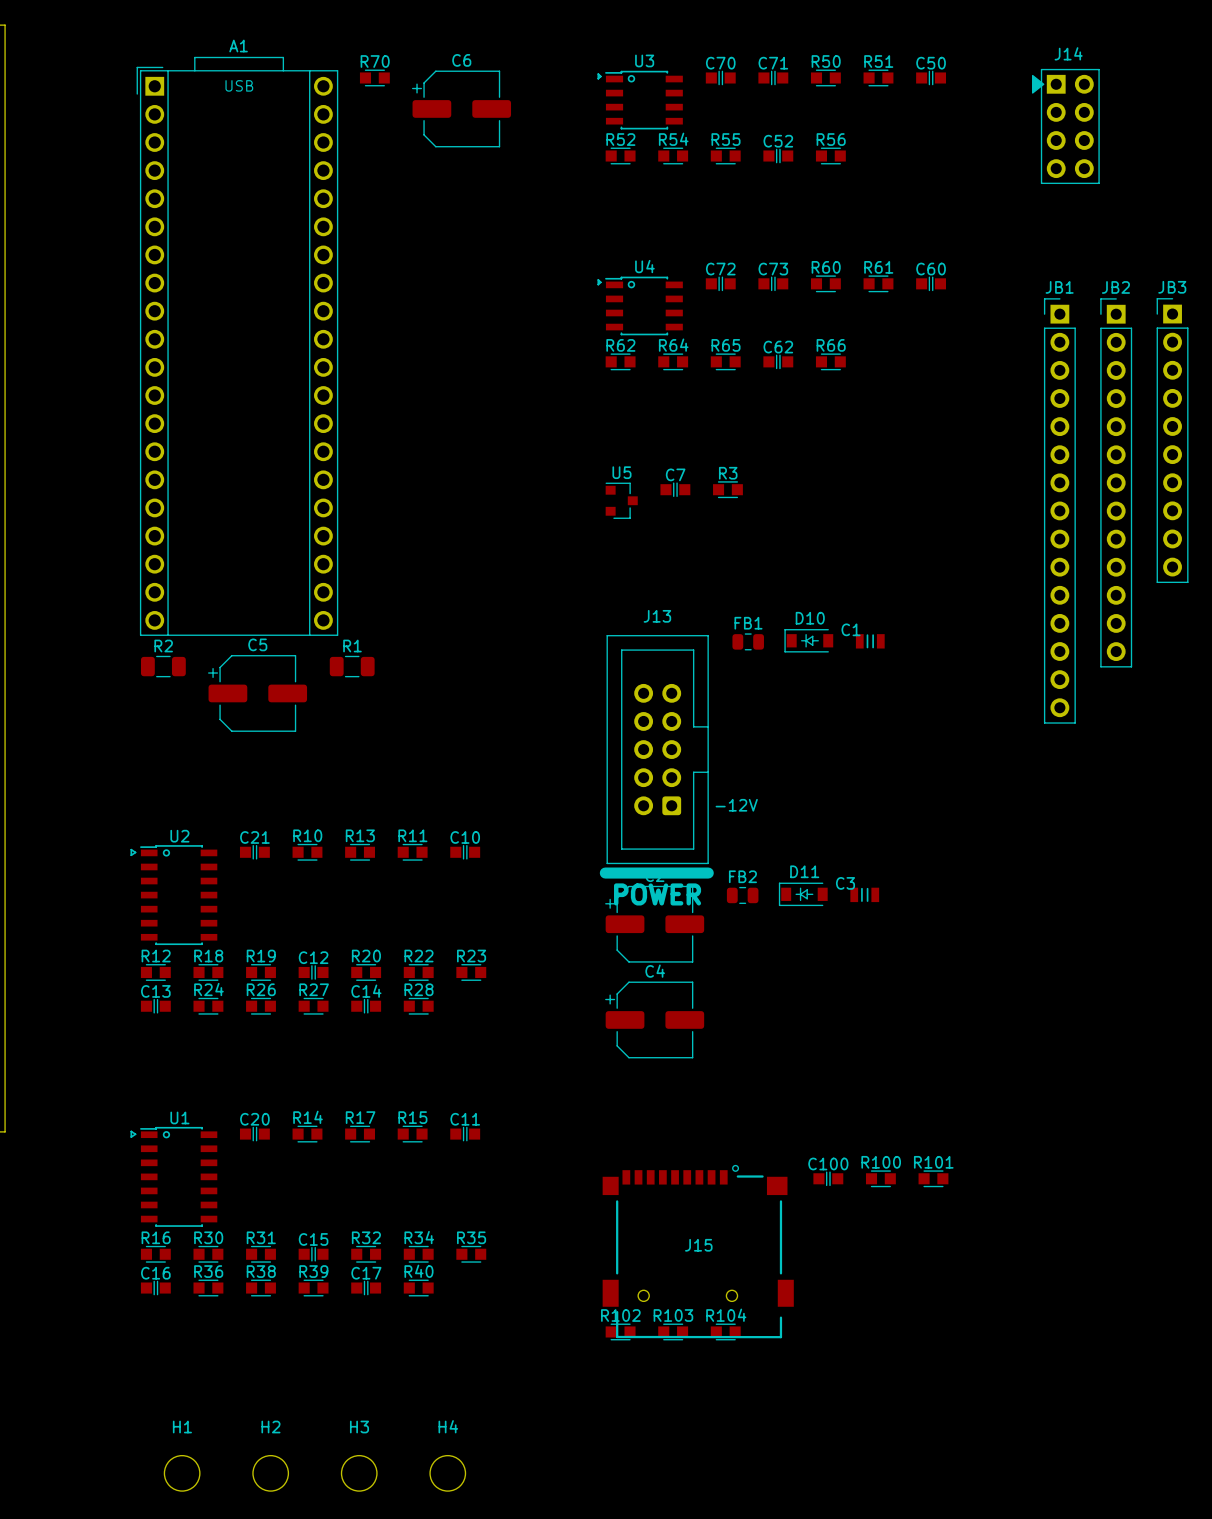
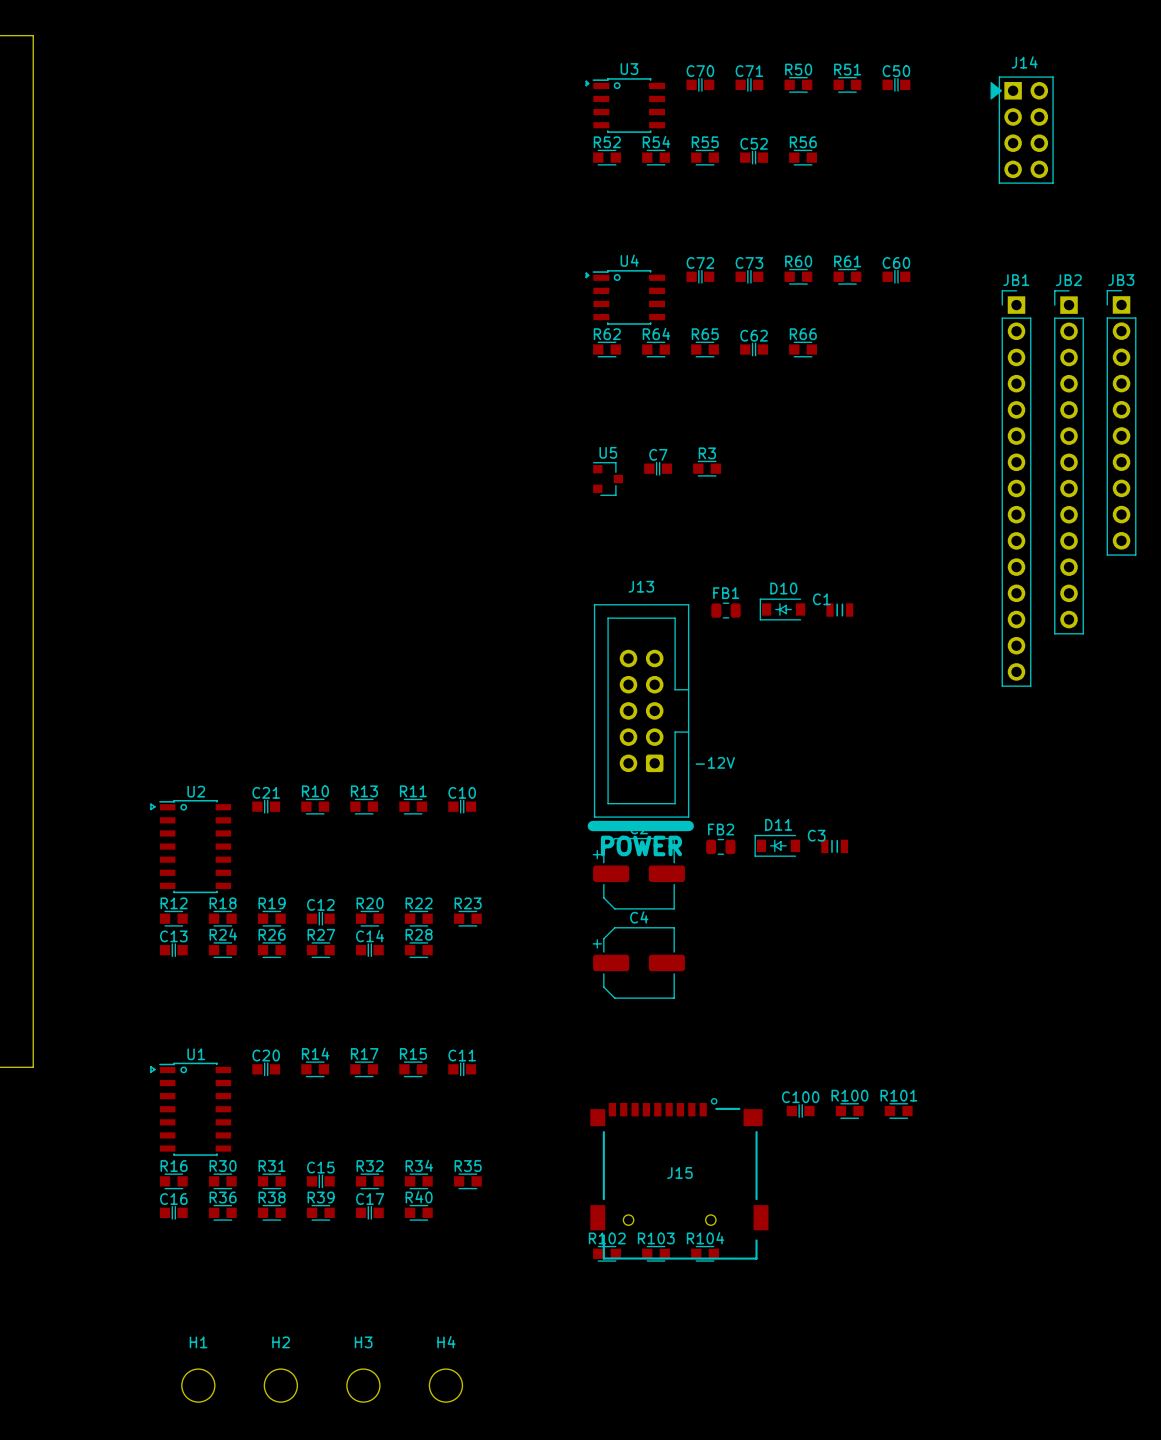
R70: (374, 77) -> none
C6: (461, 108) -> none
A1: (237, 346) -> none
R2: (163, 666) -> none
R1: (352, 666) -> none
C5: (257, 693) -> none

